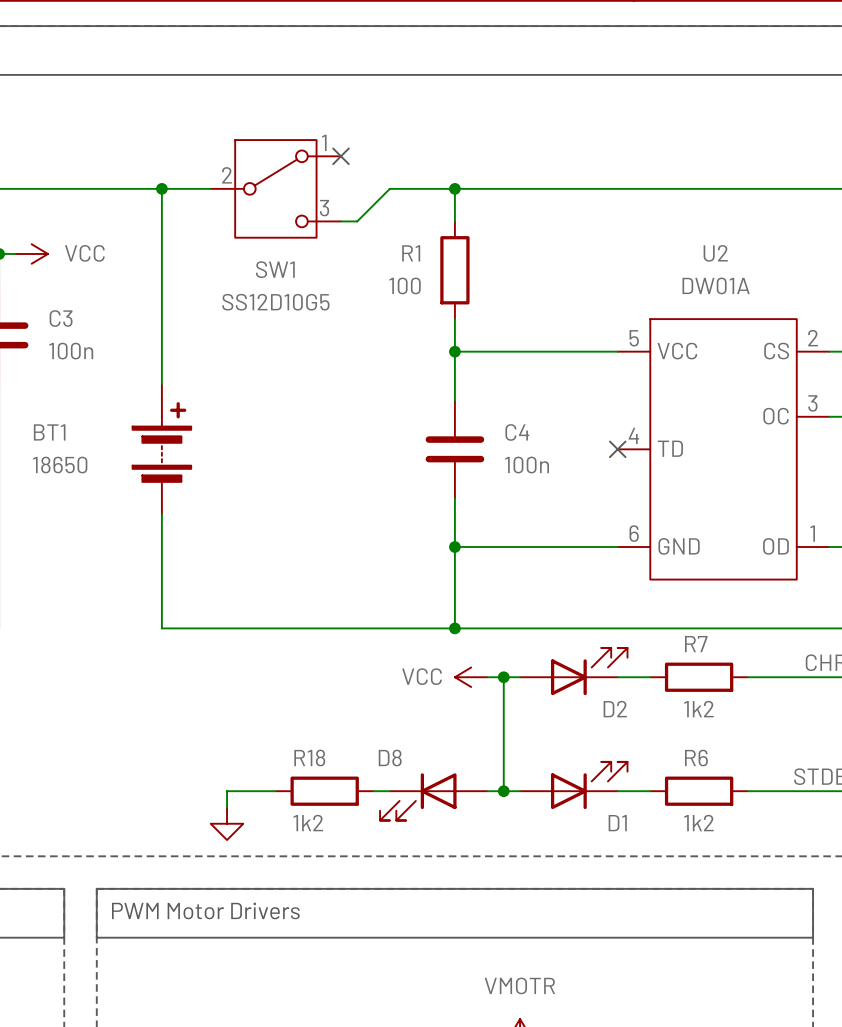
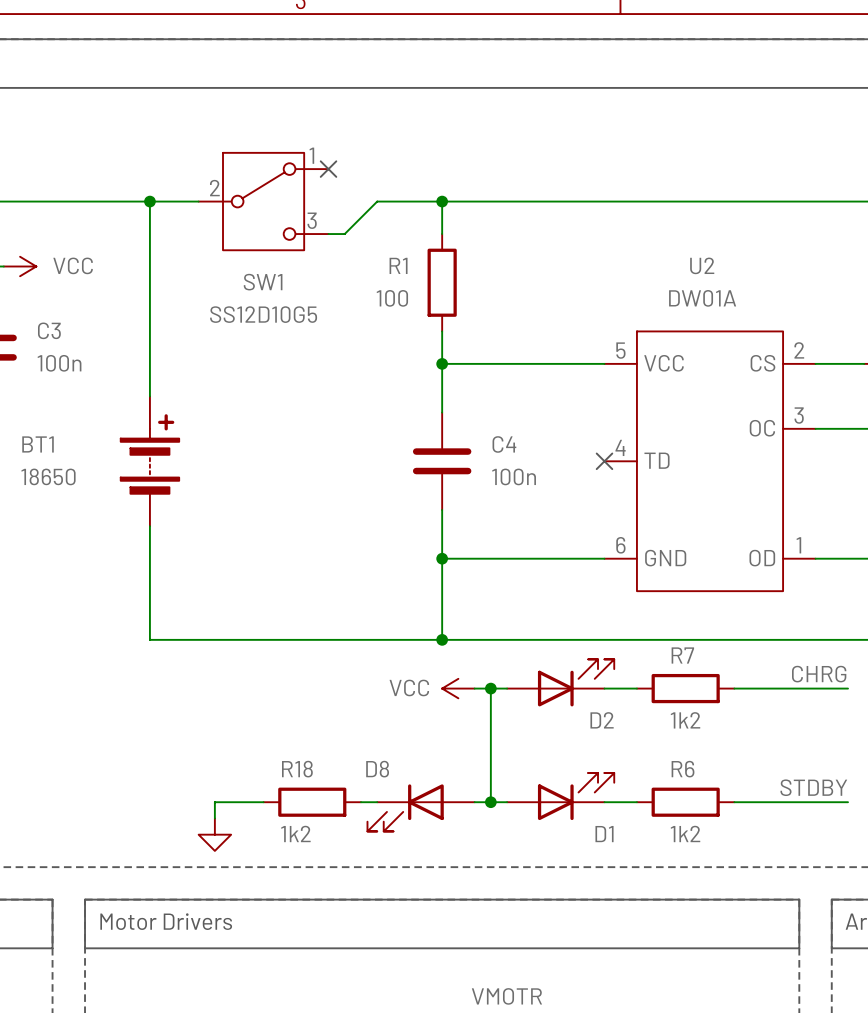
text: PWM Motor Drivers (205, 910) -> Motor Drivers (166, 921)

